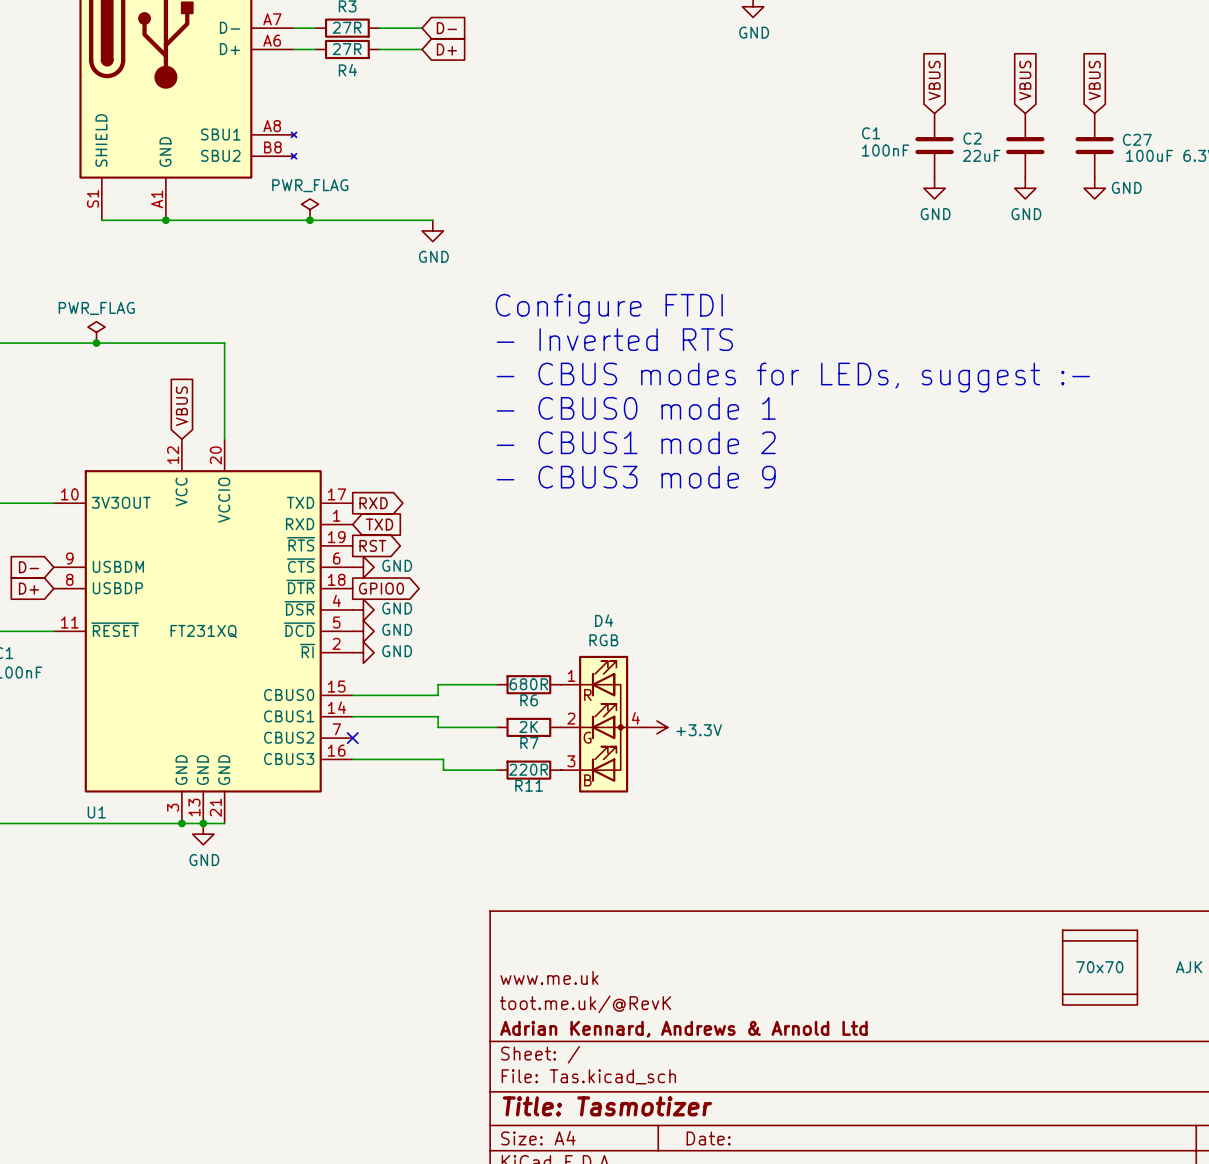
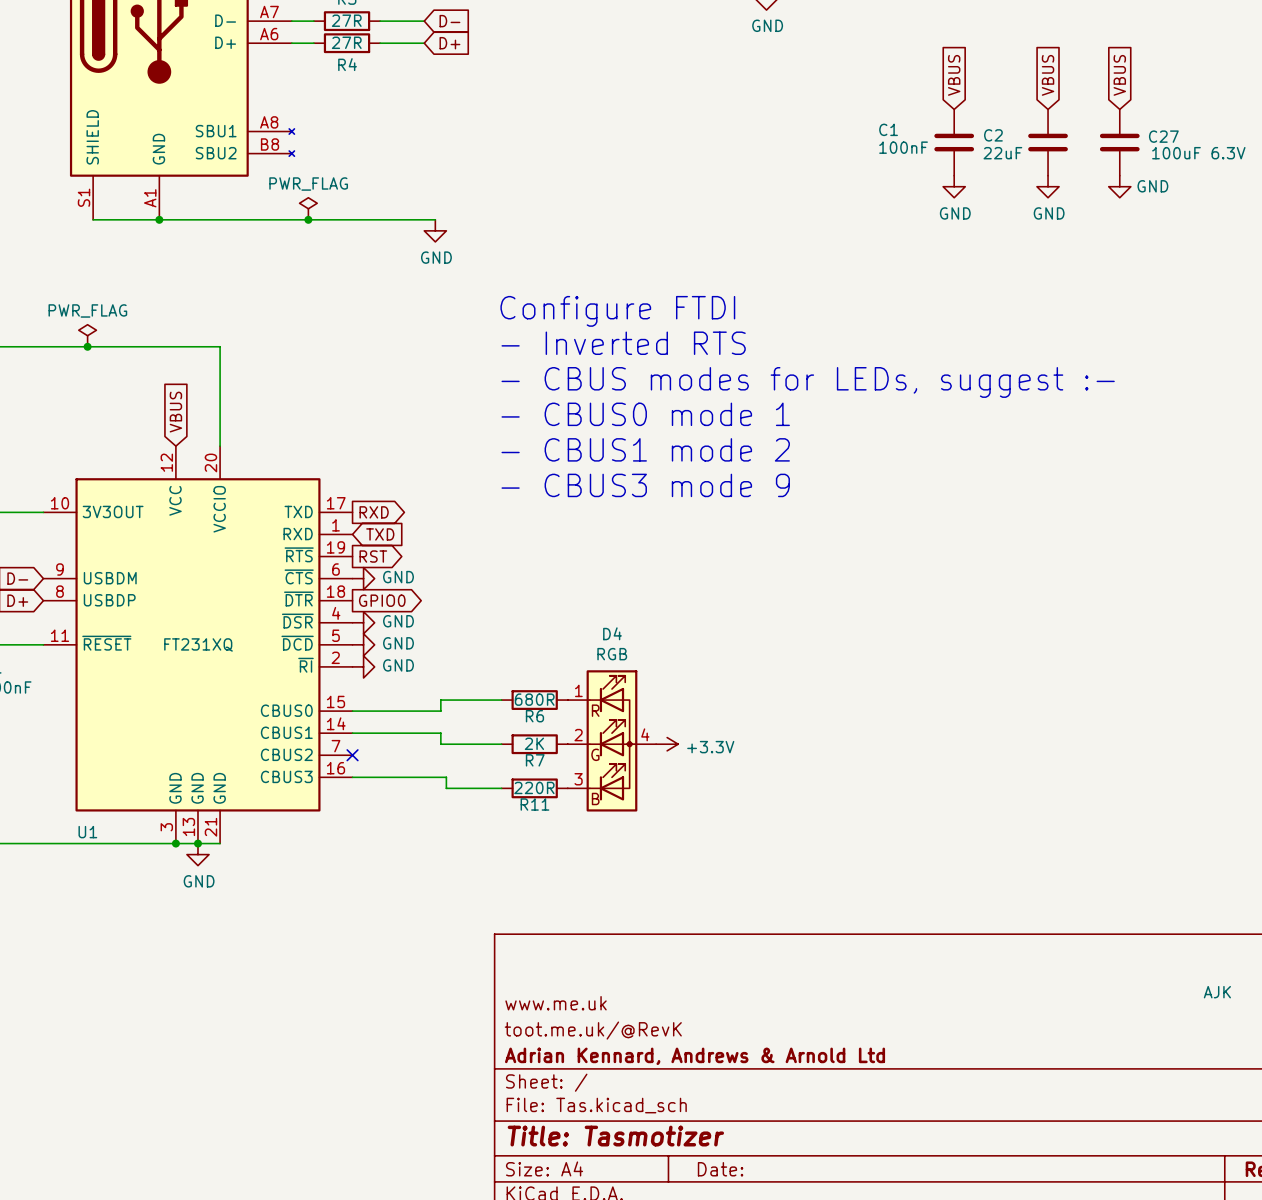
part: (1100, 940) -> none
part: 70x70 (1100, 967) -> none
part: (1100, 994) -> none

